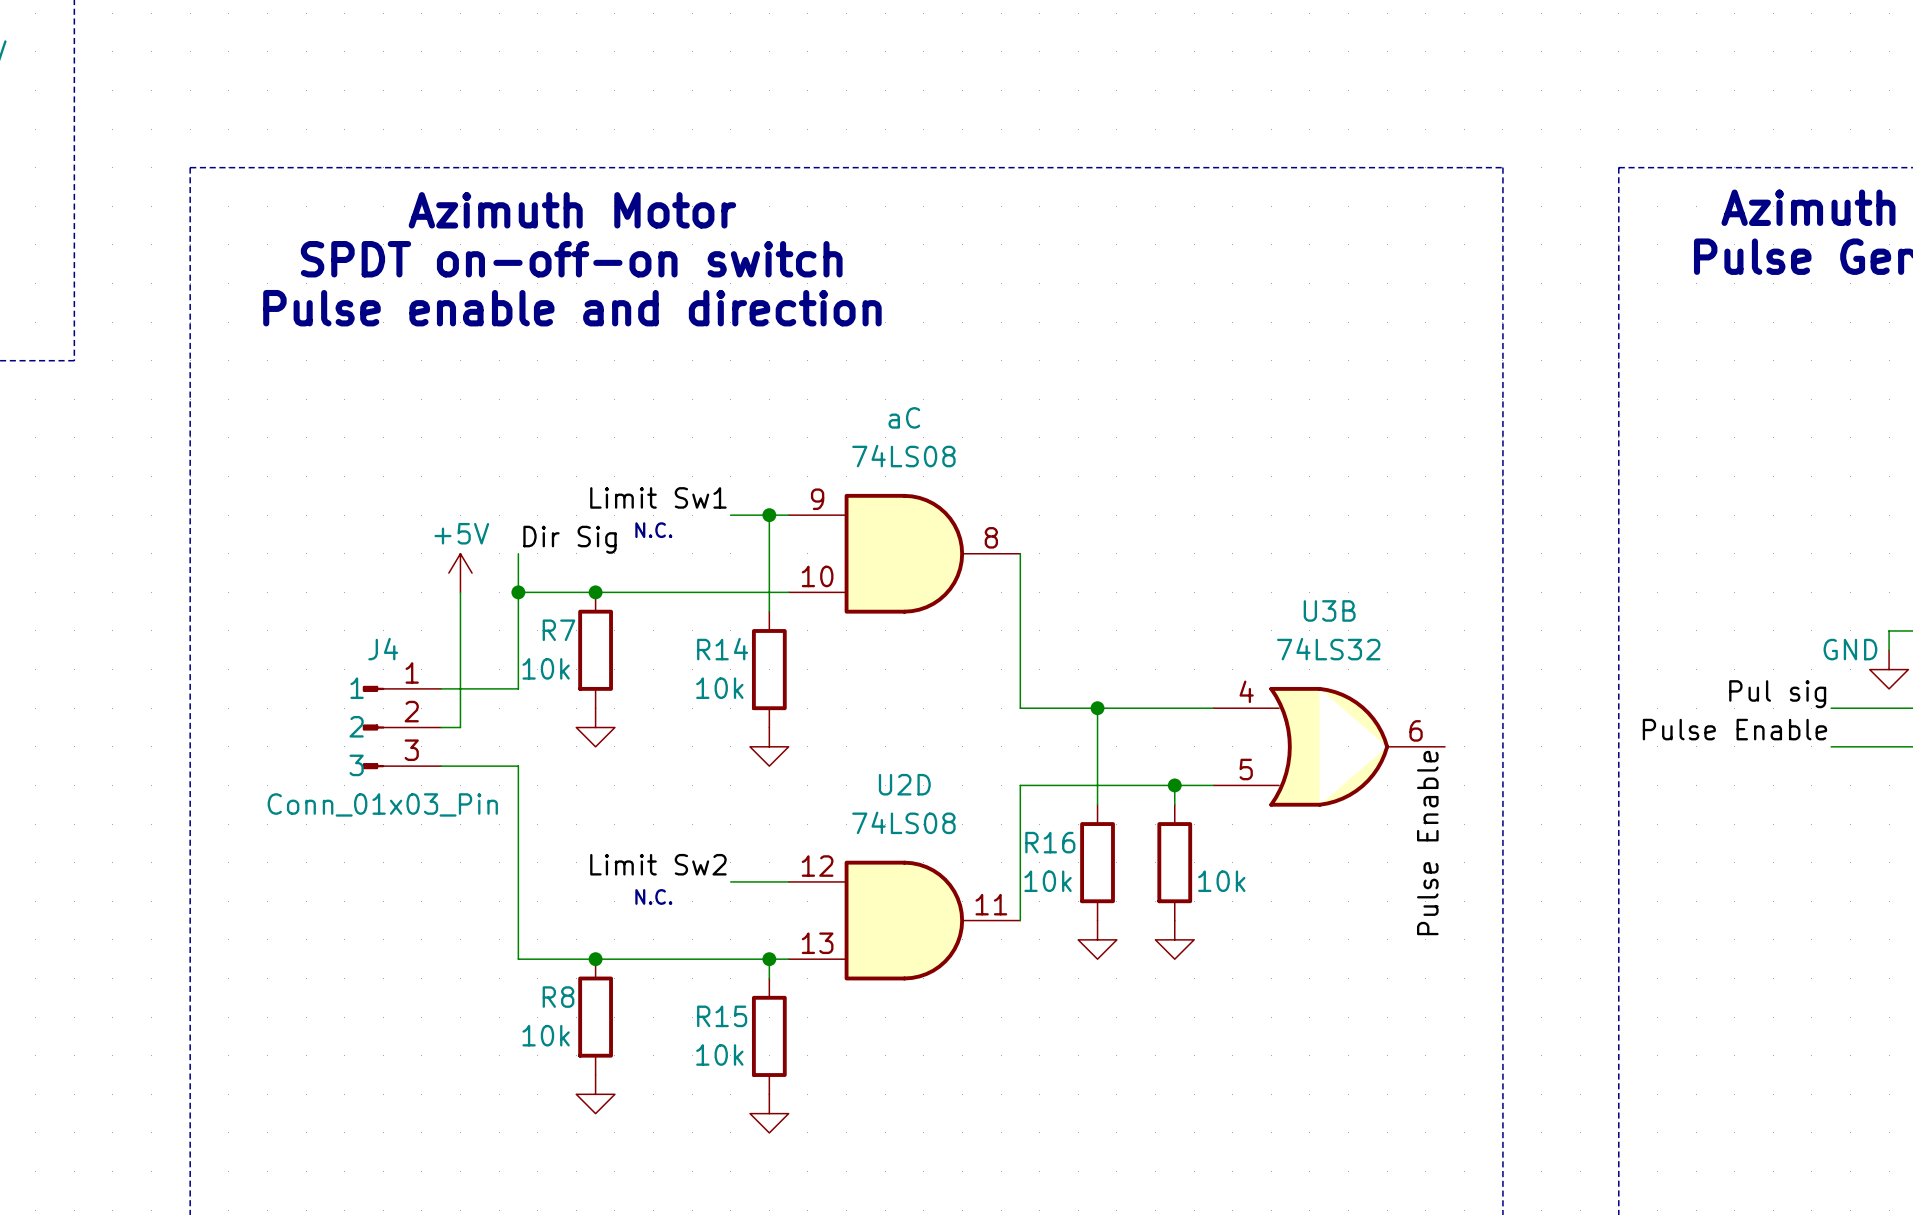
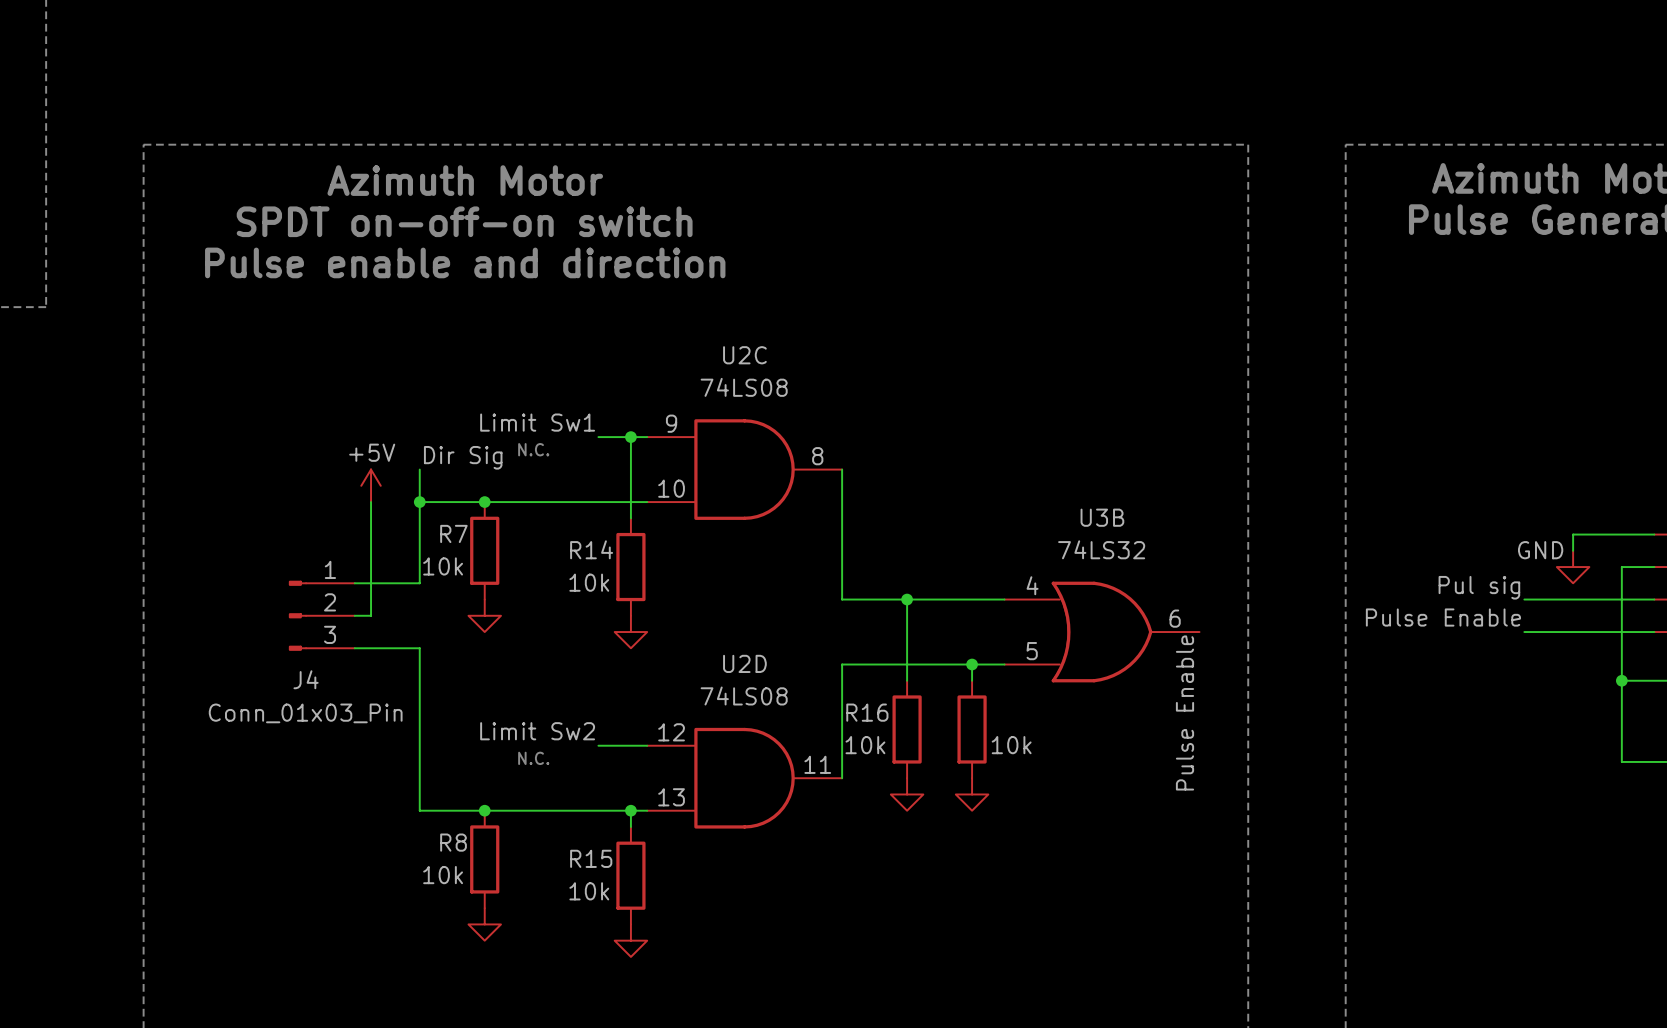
aC name: aC (904, 417) -> U2C (744, 355)
J4 name position: J4 (383, 649) -> J4 (306, 679)
J4 pin name: 1 (357, 688) -> none
J4 pin name: 2 (356, 726) -> none
J4 pin name: 3 (356, 765) -> none
J4 value position: Conn_01x03_Pin (382, 804) -> Conn_01x03_Pin (305, 713)

